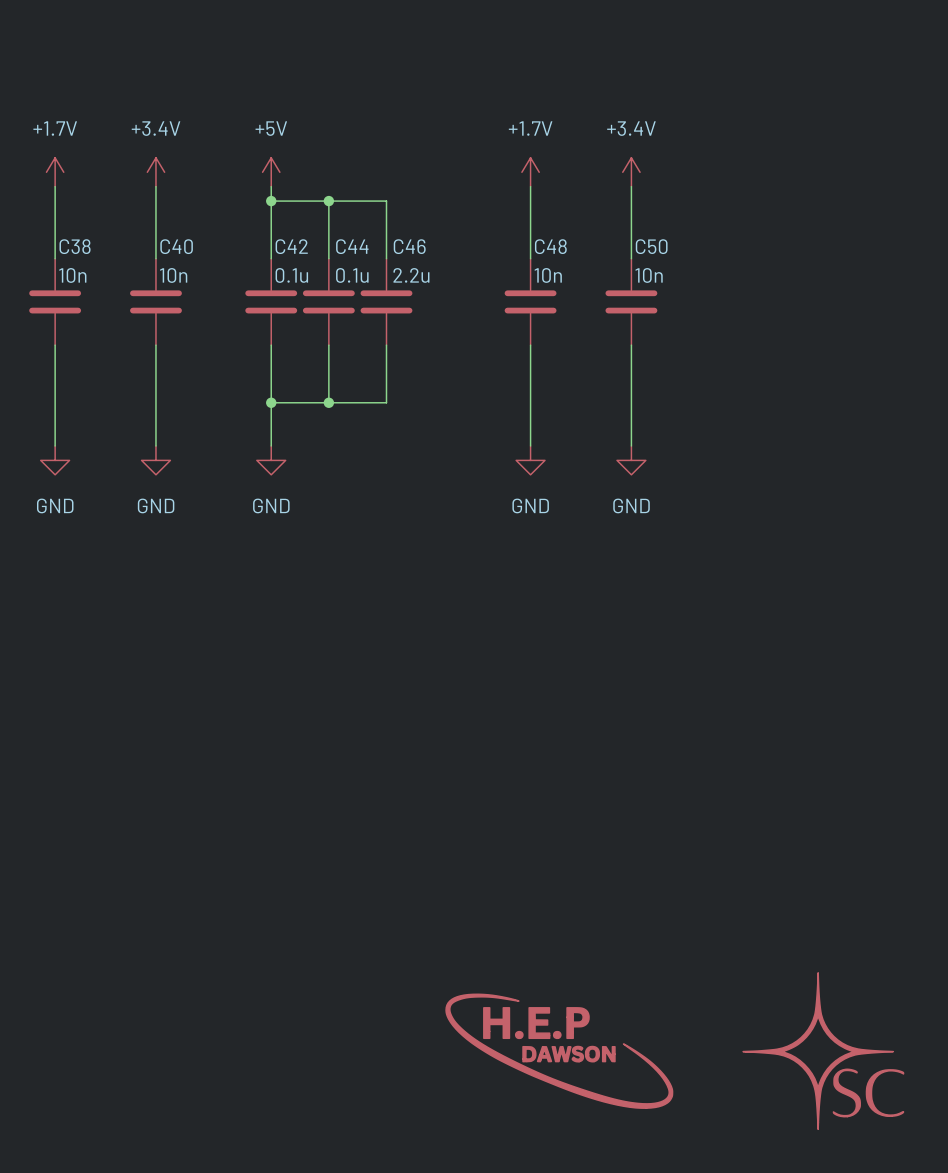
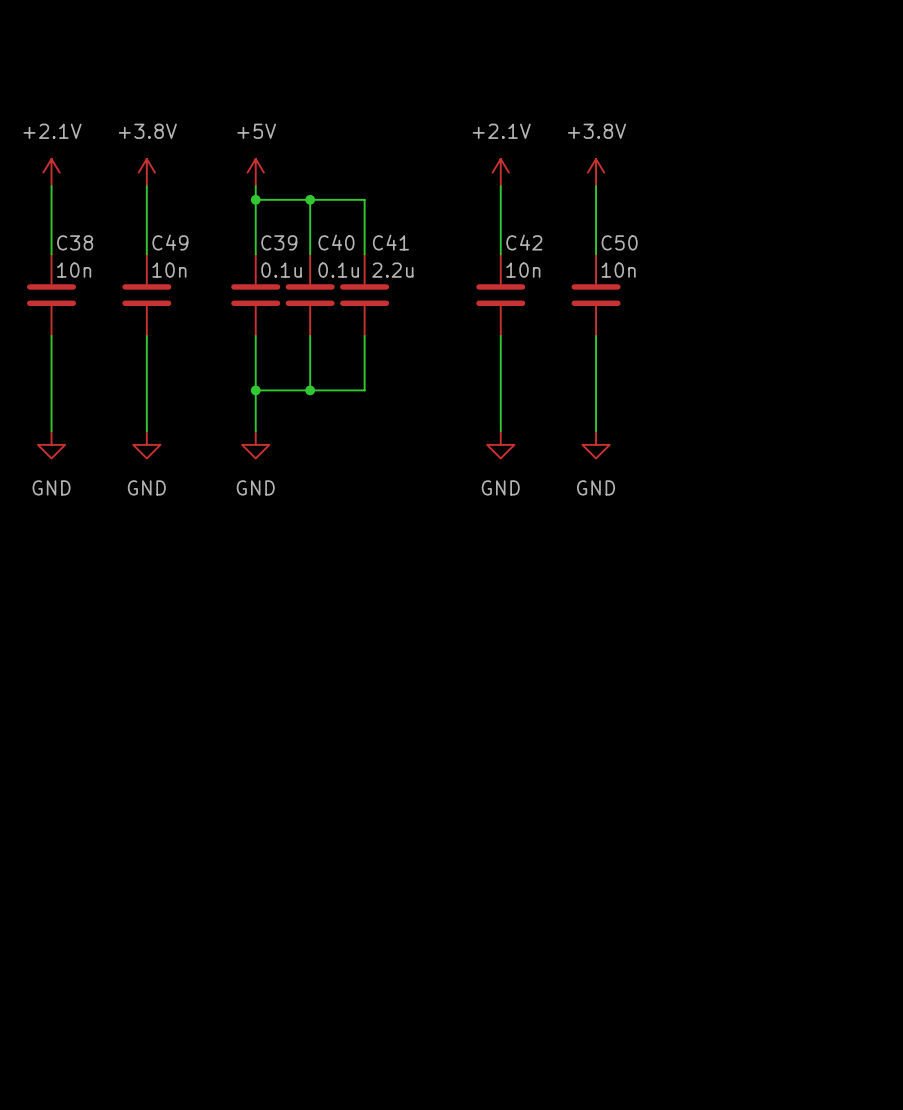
power symbol: +1.7V (55, 172) -> +2.1V (51, 172)
power symbol: +3.4V (155, 172) -> +3.8V (146, 172)
power symbol: +1.7V (530, 172) -> +2.1V (500, 172)
power symbol: +3.4V (631, 172) -> +3.8V (596, 172)
C40 name: C40 (176, 246) -> C49 (170, 242)
C42 name: C42 (291, 246) -> C39 (279, 242)
C44 name: C44 (352, 246) -> C40 (336, 242)
C46 name: C46 (409, 246) -> C41 (390, 242)
C48 name: C48 (550, 246) -> C42 (524, 242)
power symbol: (559, 1051) -> none
power symbol: (823, 1051) -> none

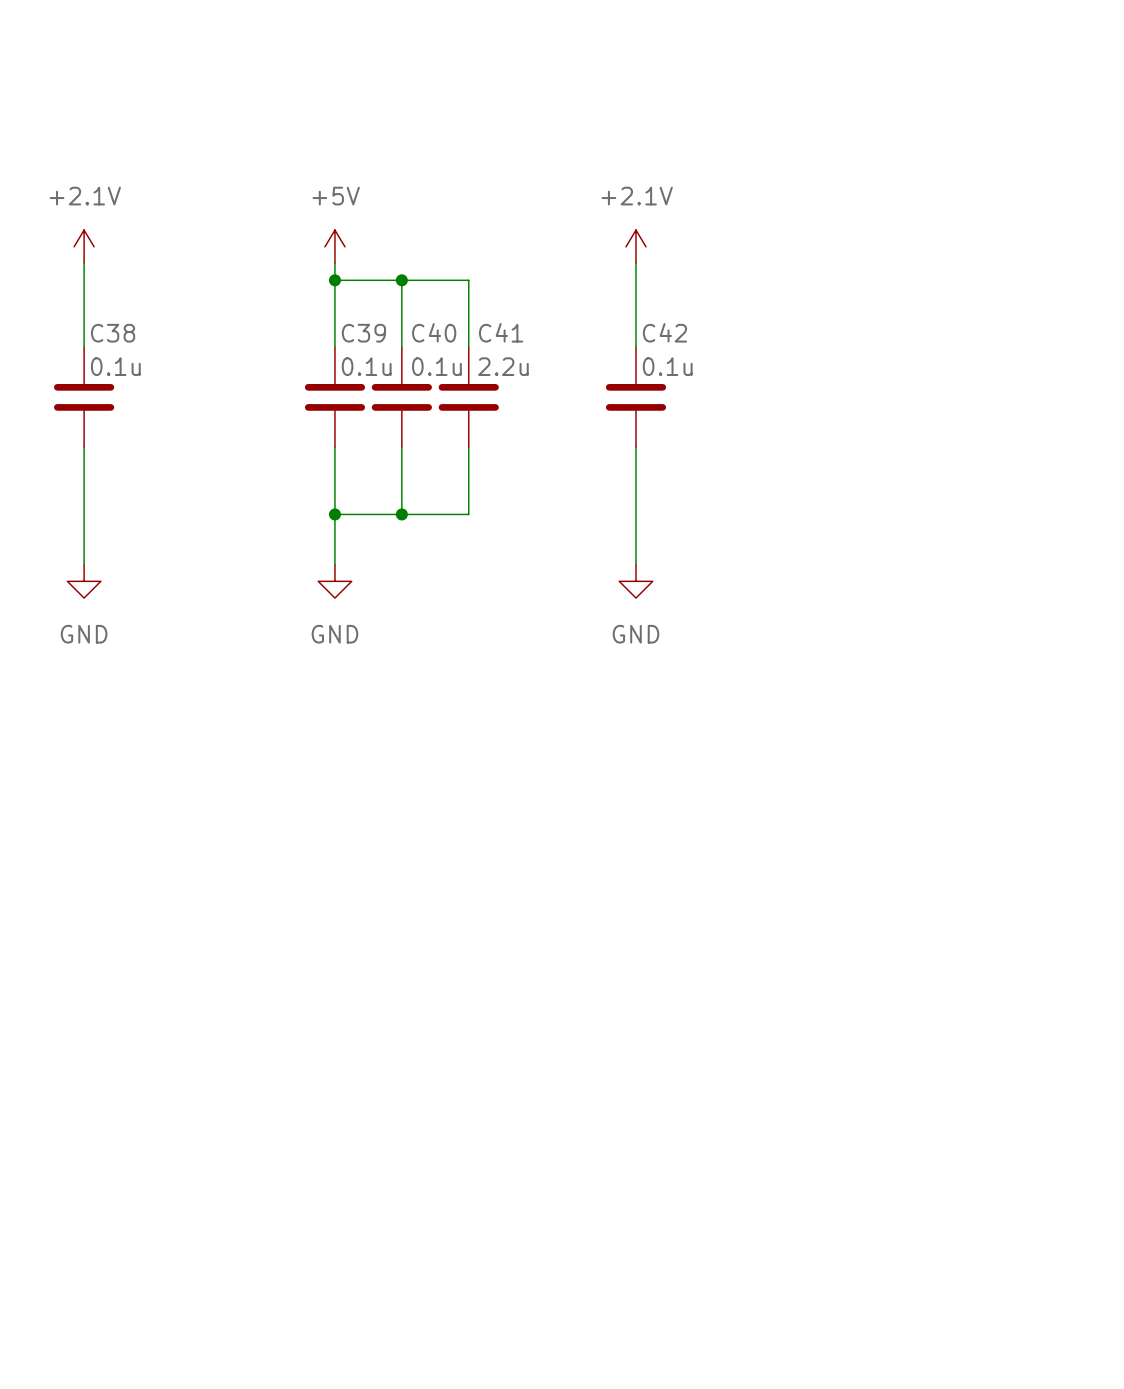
power symbol: +3.8V (146, 172) -> none
power symbol: +3.8V (596, 172) -> none
wire: (146, 186) (146, 254) -> none
wire: (596, 186) (596, 254) -> none
C38 value: 10n (74, 270) -> 0.1u (115, 366)
C42 value: 10n (523, 270) -> 0.1u (667, 366)
C49: 10n (146, 295) -> none
C50: 10n (596, 295) -> none
wire: (146, 335) (146, 431) -> none
wire: (596, 335) (596, 431) -> none
power symbol: GND (146, 444) -> none
power symbol: GND (596, 444) -> none

